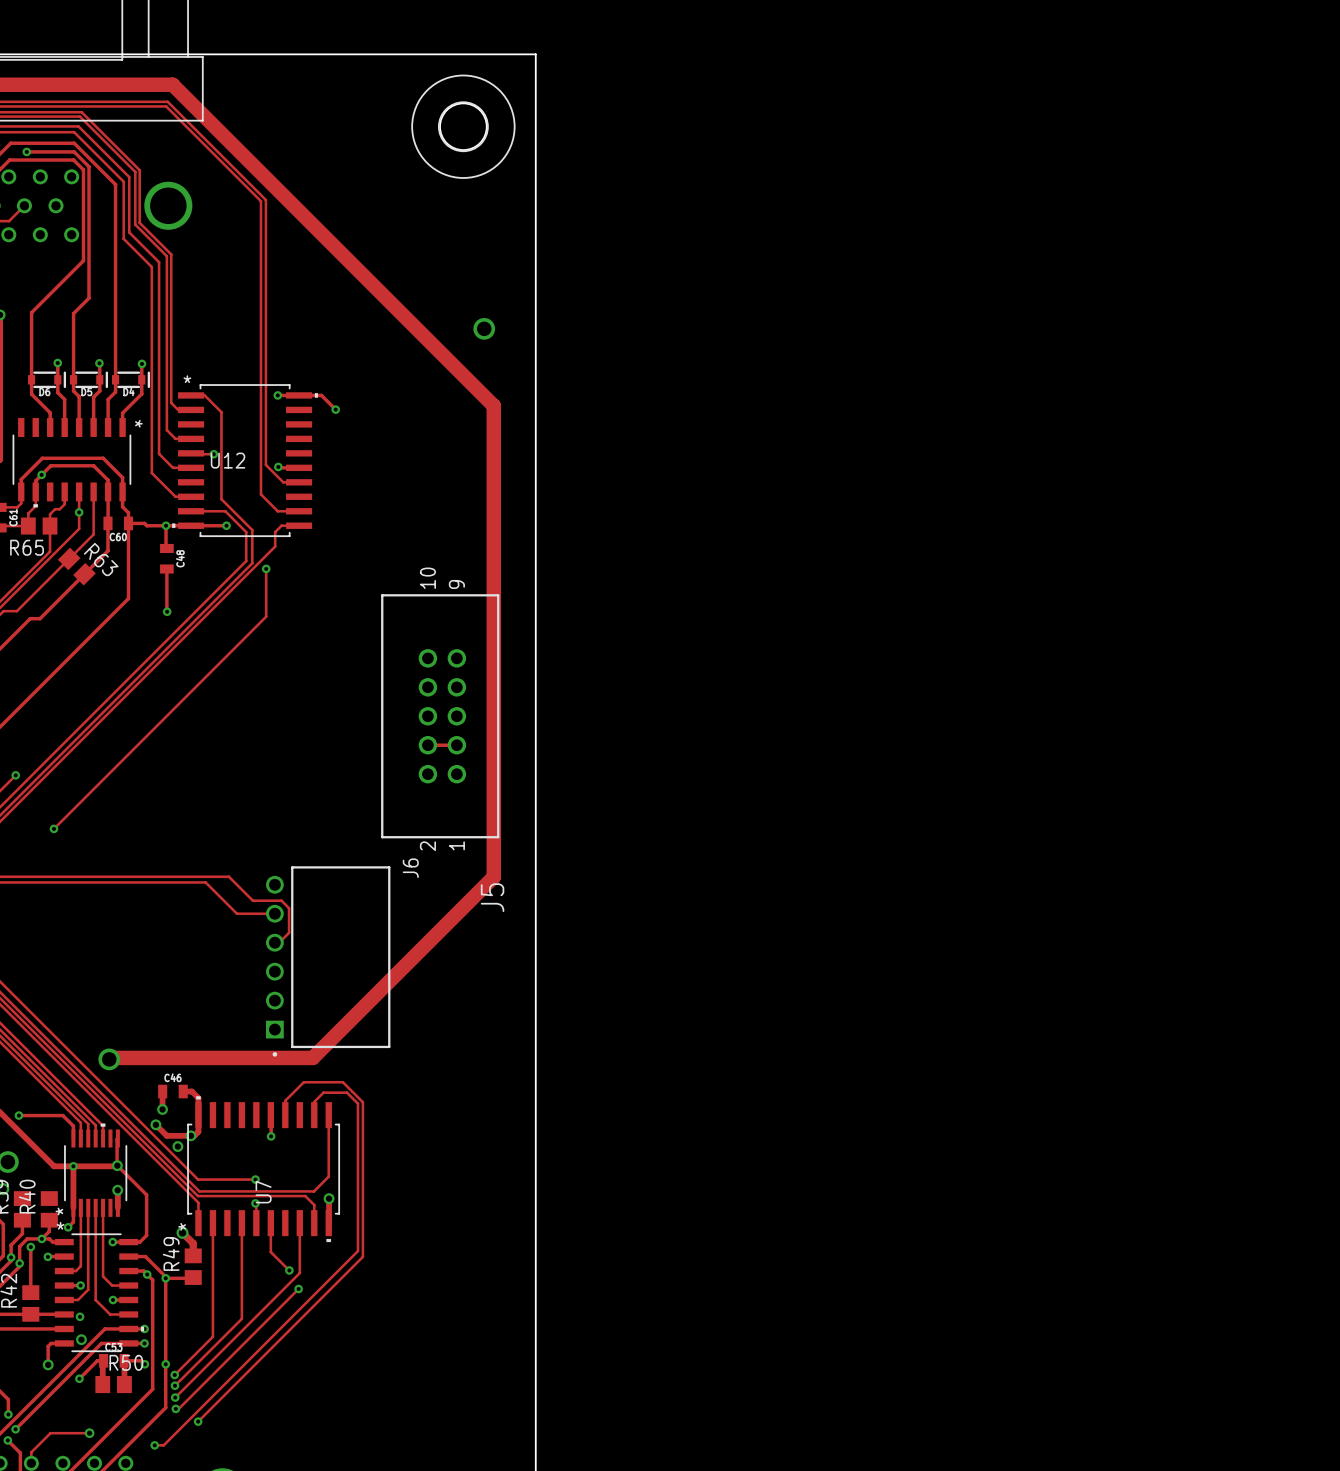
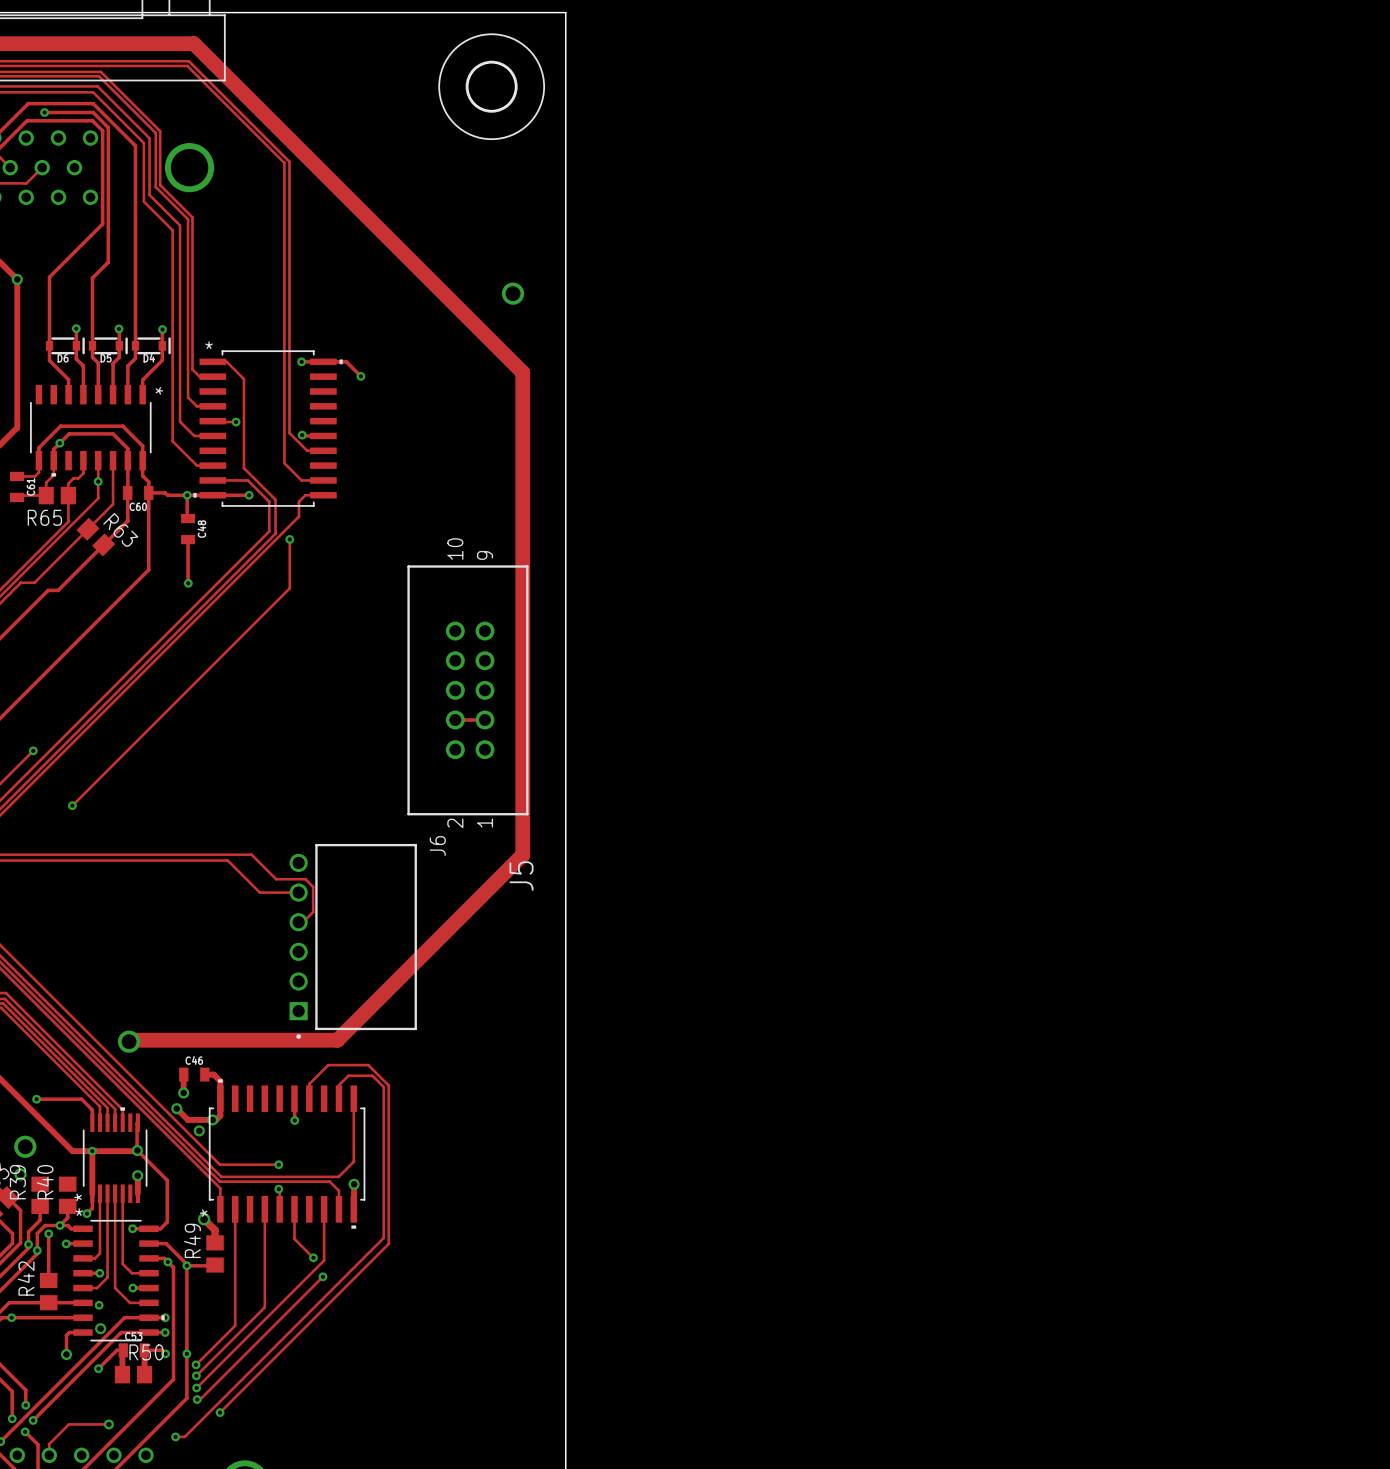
U12 name: U12 (228, 460) -> none
U7 name: U7 (263, 1192) -> none

